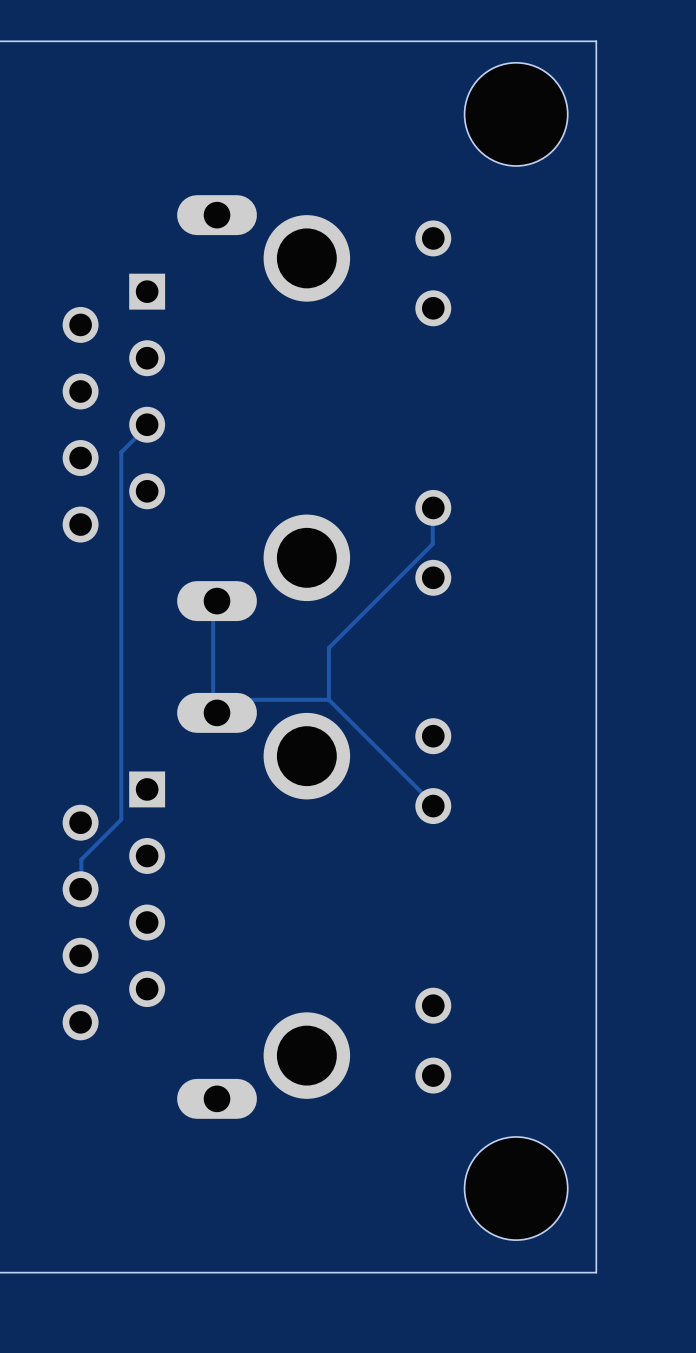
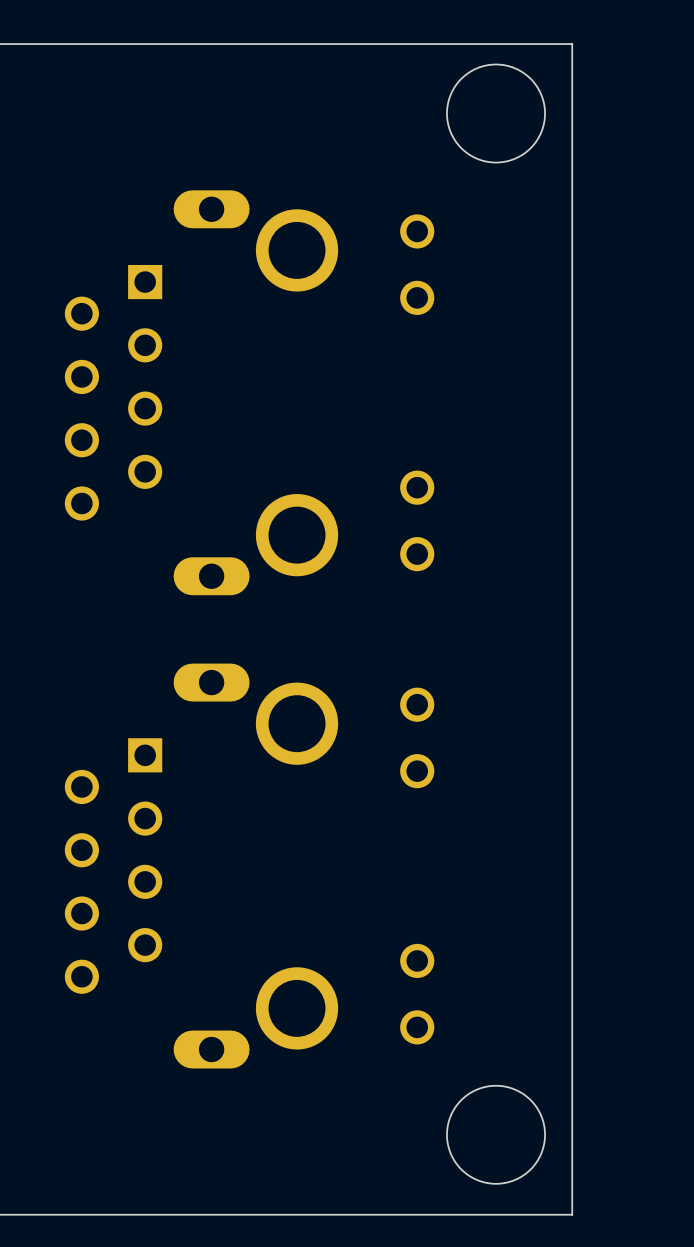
track: (147, 424) (121, 452) (121, 819) (81, 859) (80, 889) -> none
track: (433, 507) (432, 544) (328, 647) (328, 699) -> none
track: (217, 601) (213, 604) (213, 711) (217, 712) (213, 699) (328, 699) -> none
track: (328, 699) (433, 806) -> none

